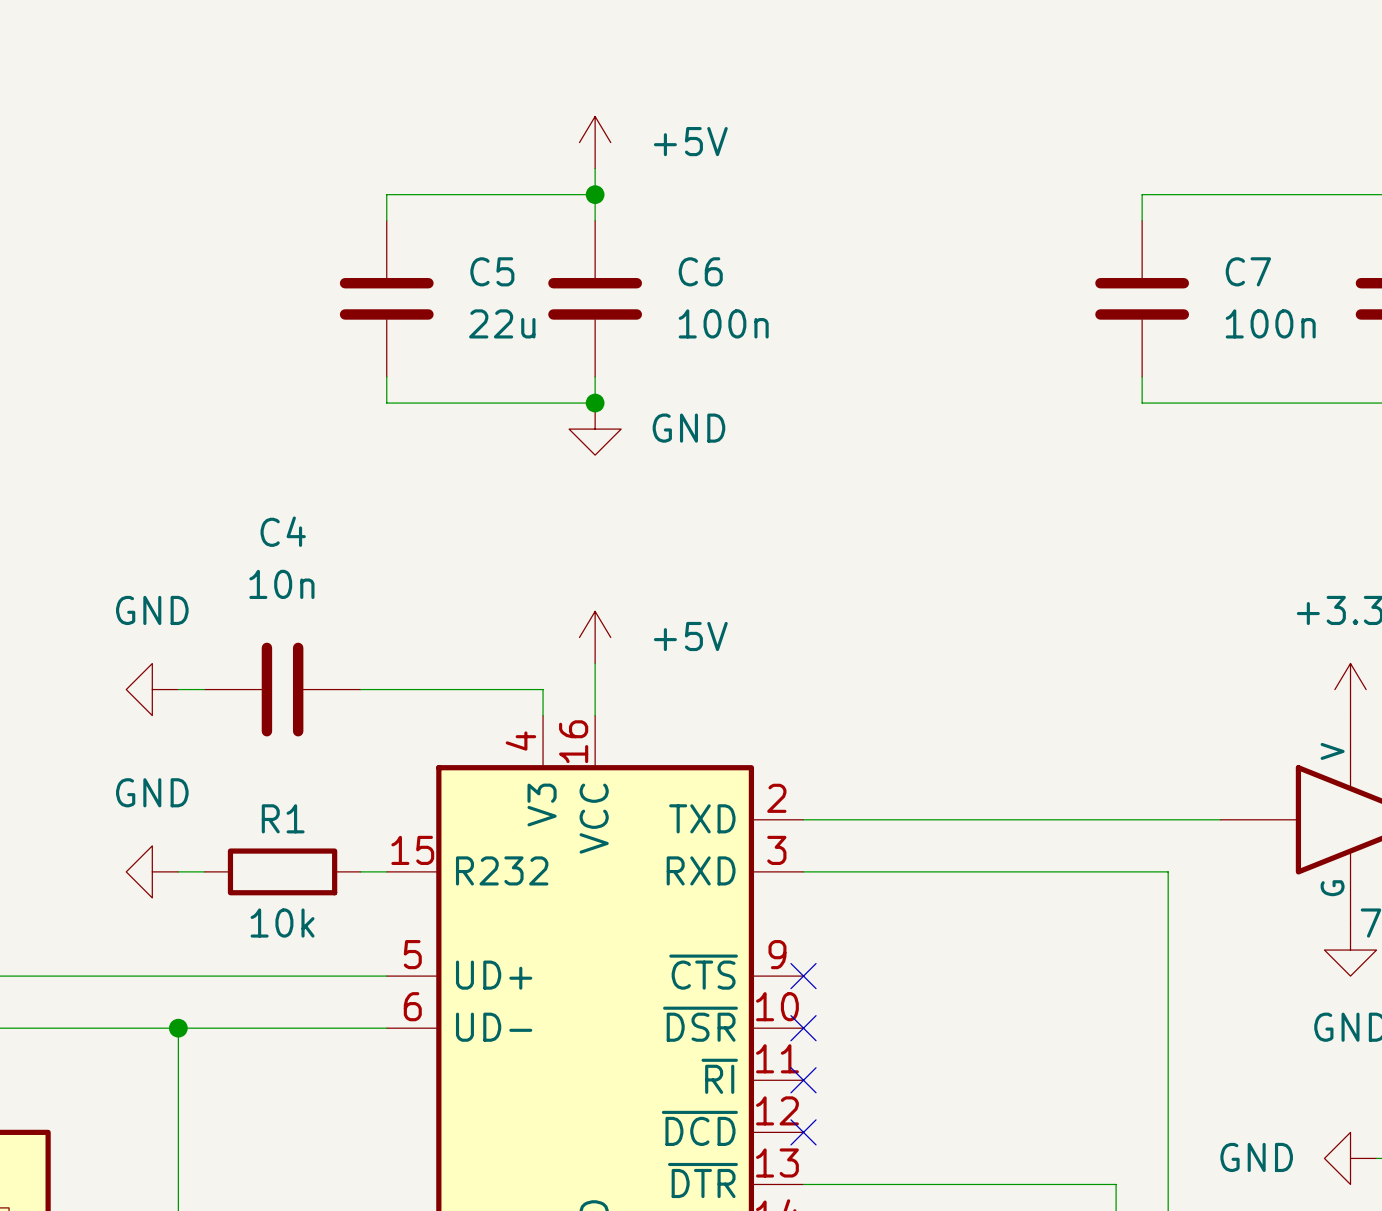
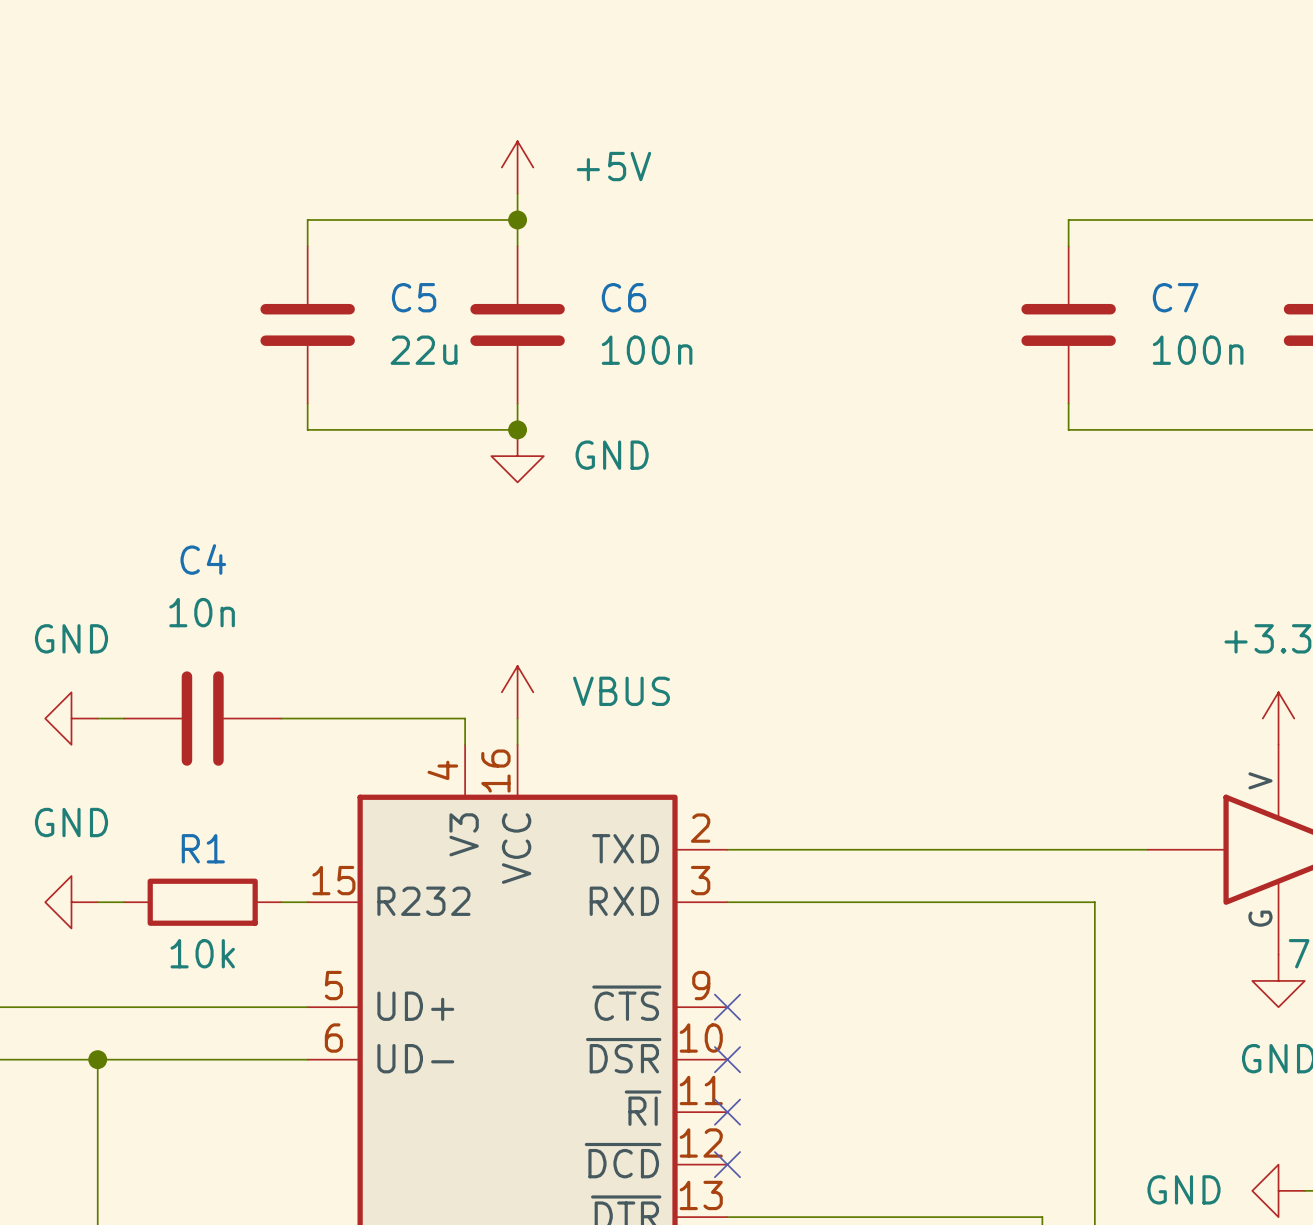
power symbol: +5V (595, 637) -> none
power symbol: none -> VBUS (517, 692)

